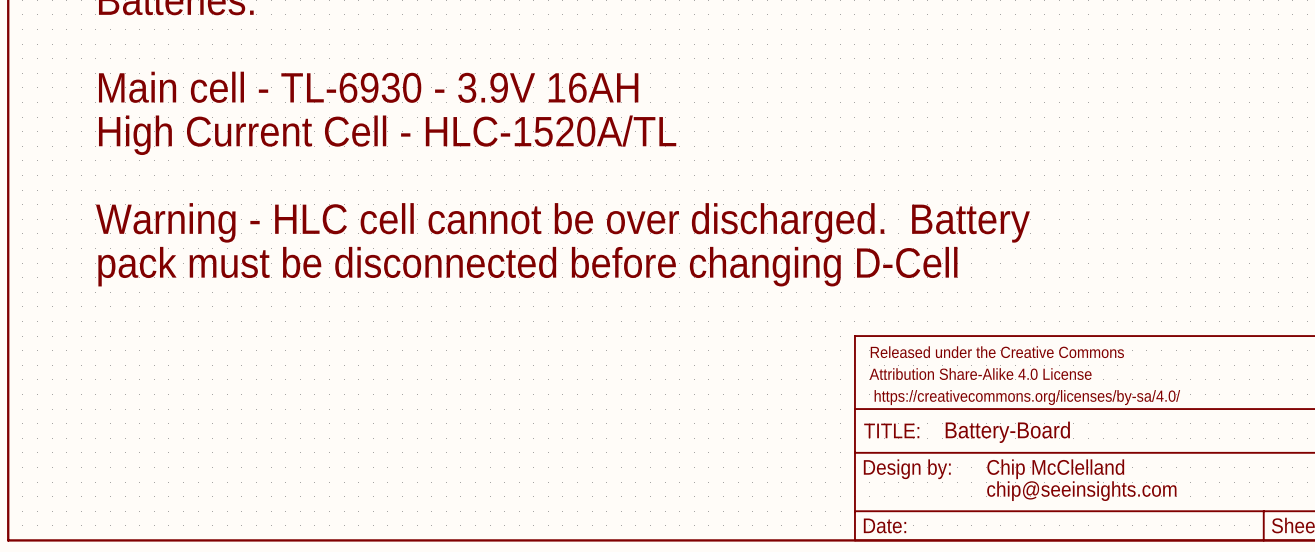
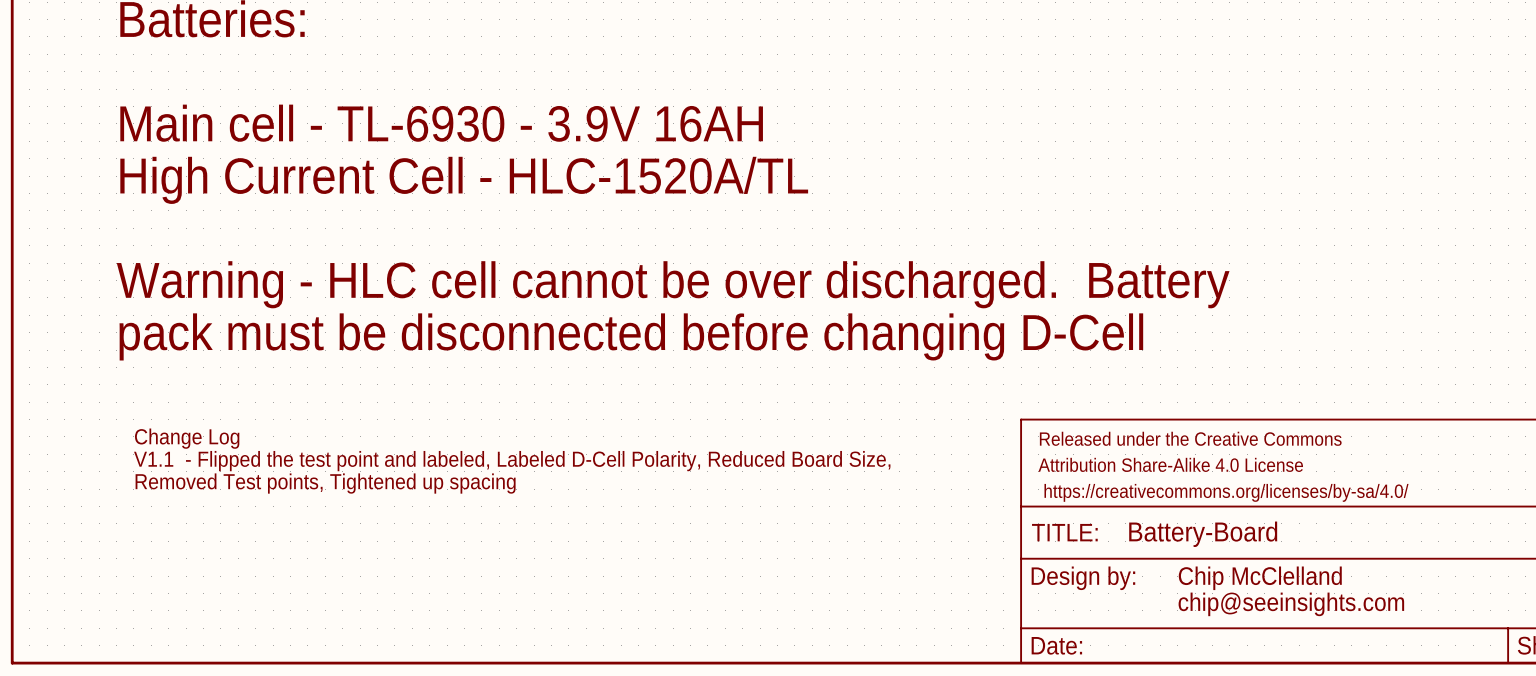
text: none -> Change Log (187, 438)
text: none -> V1.1 - Flipped the test point and labeled, Labeled D-Cell Polarity, Reduced Board Size, (512, 461)
text: none -> Removed Test points, Tightened up spacing (325, 483)

